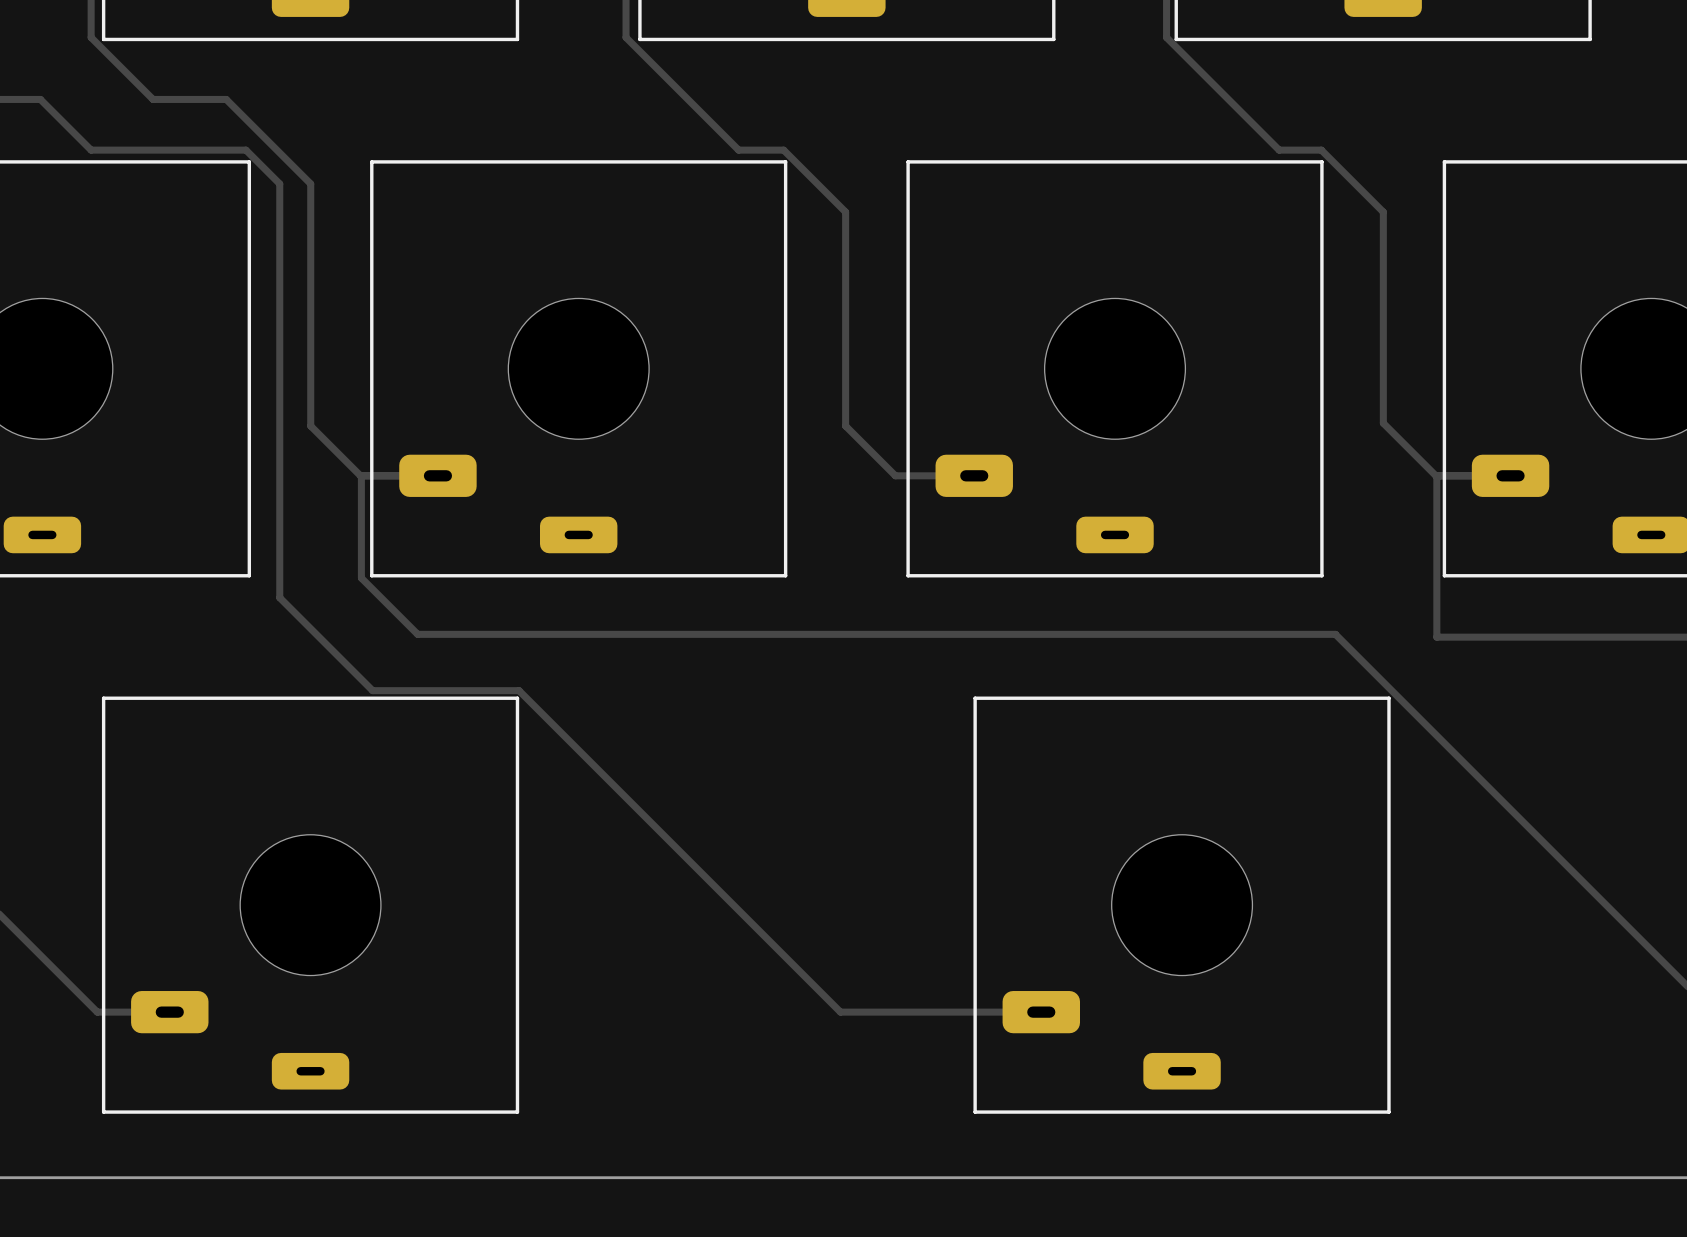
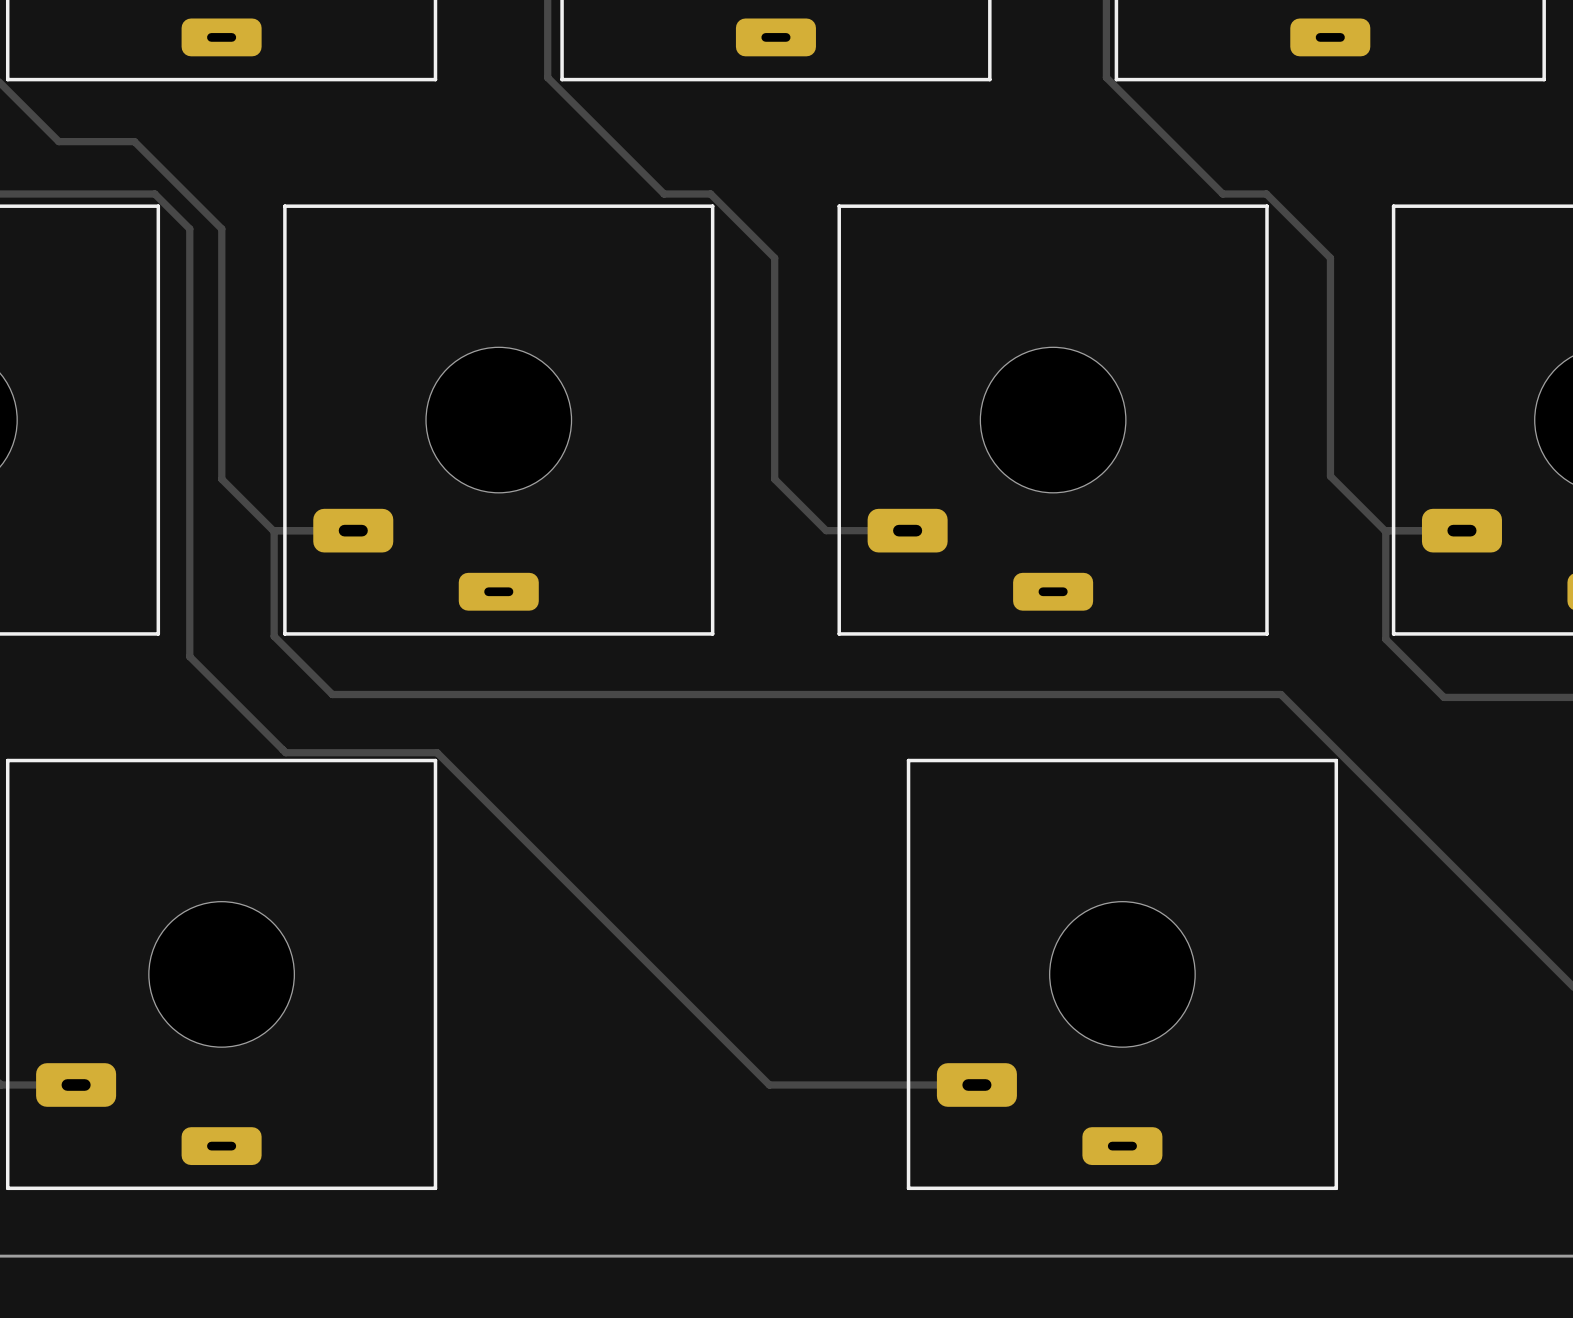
track: (1436, 580) (1436, 637) (1493, 637) -> (1385, 639) (1443, 697)

